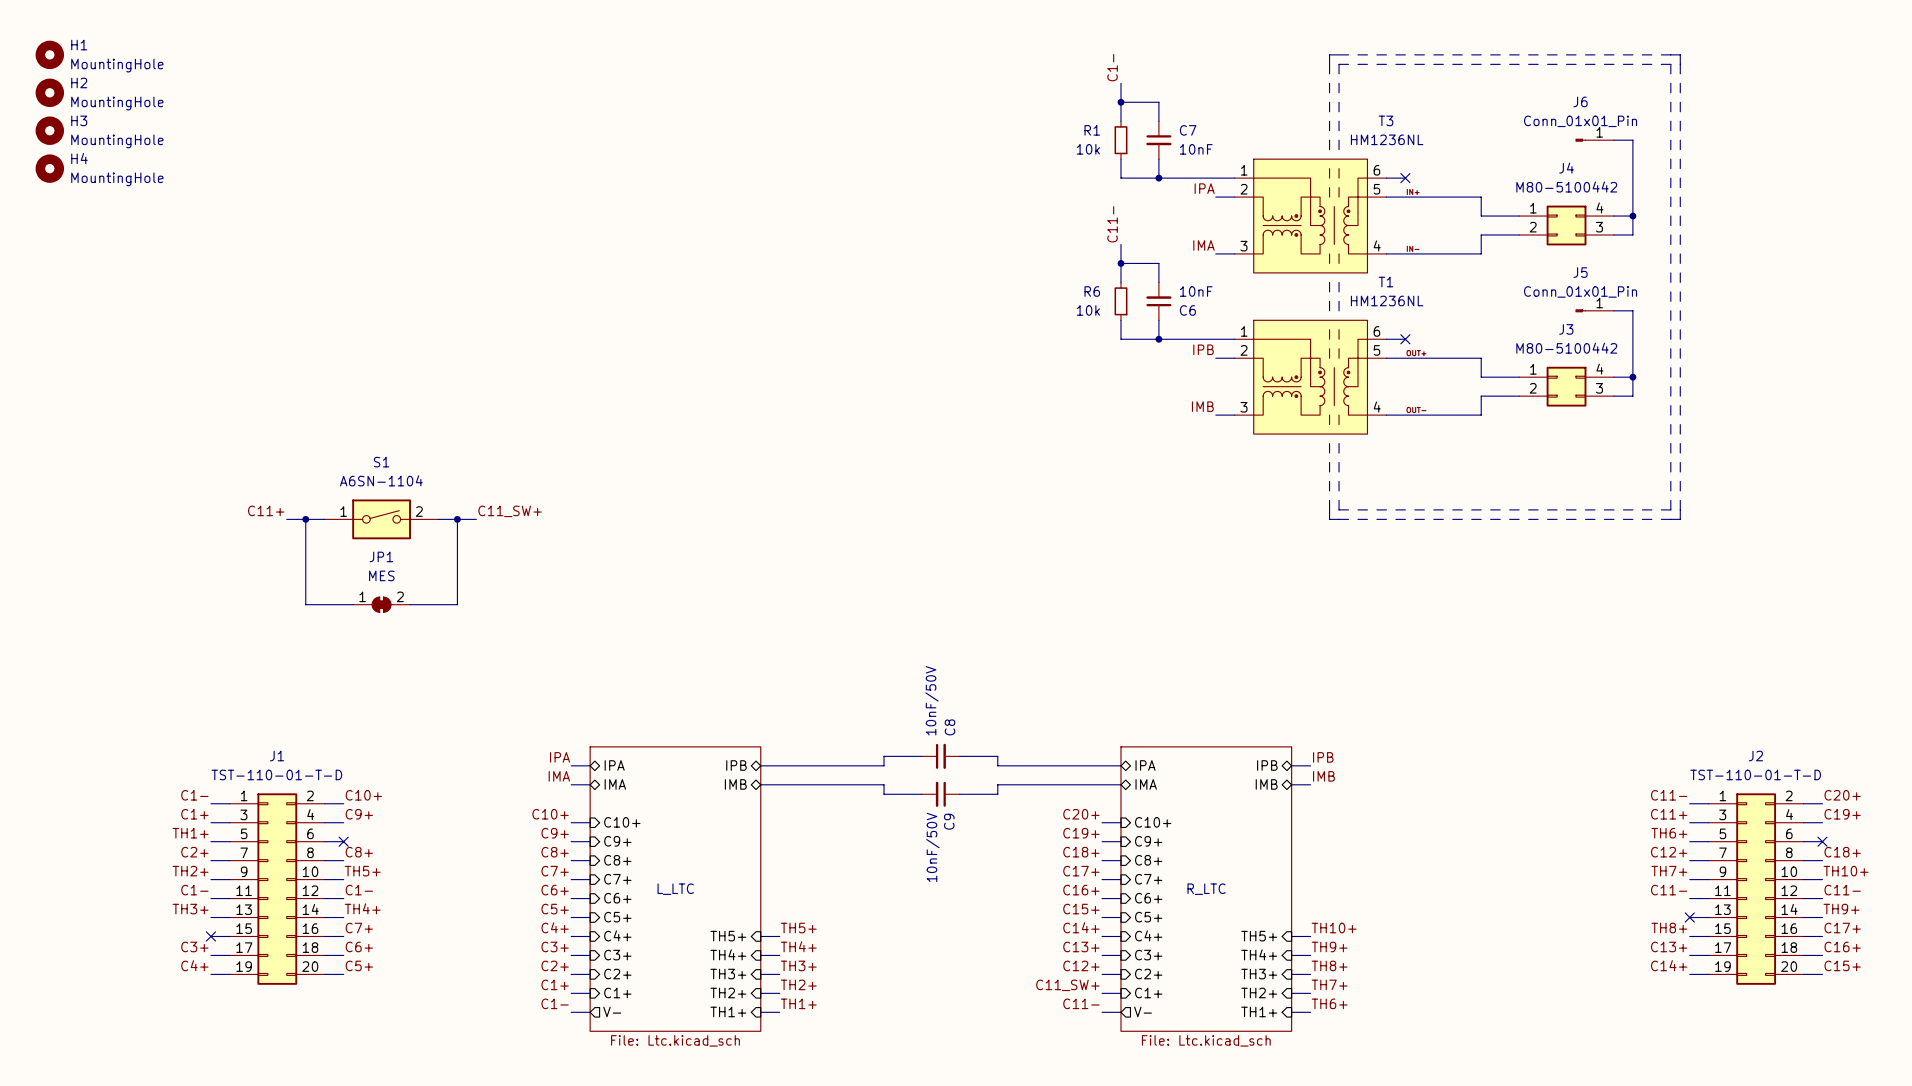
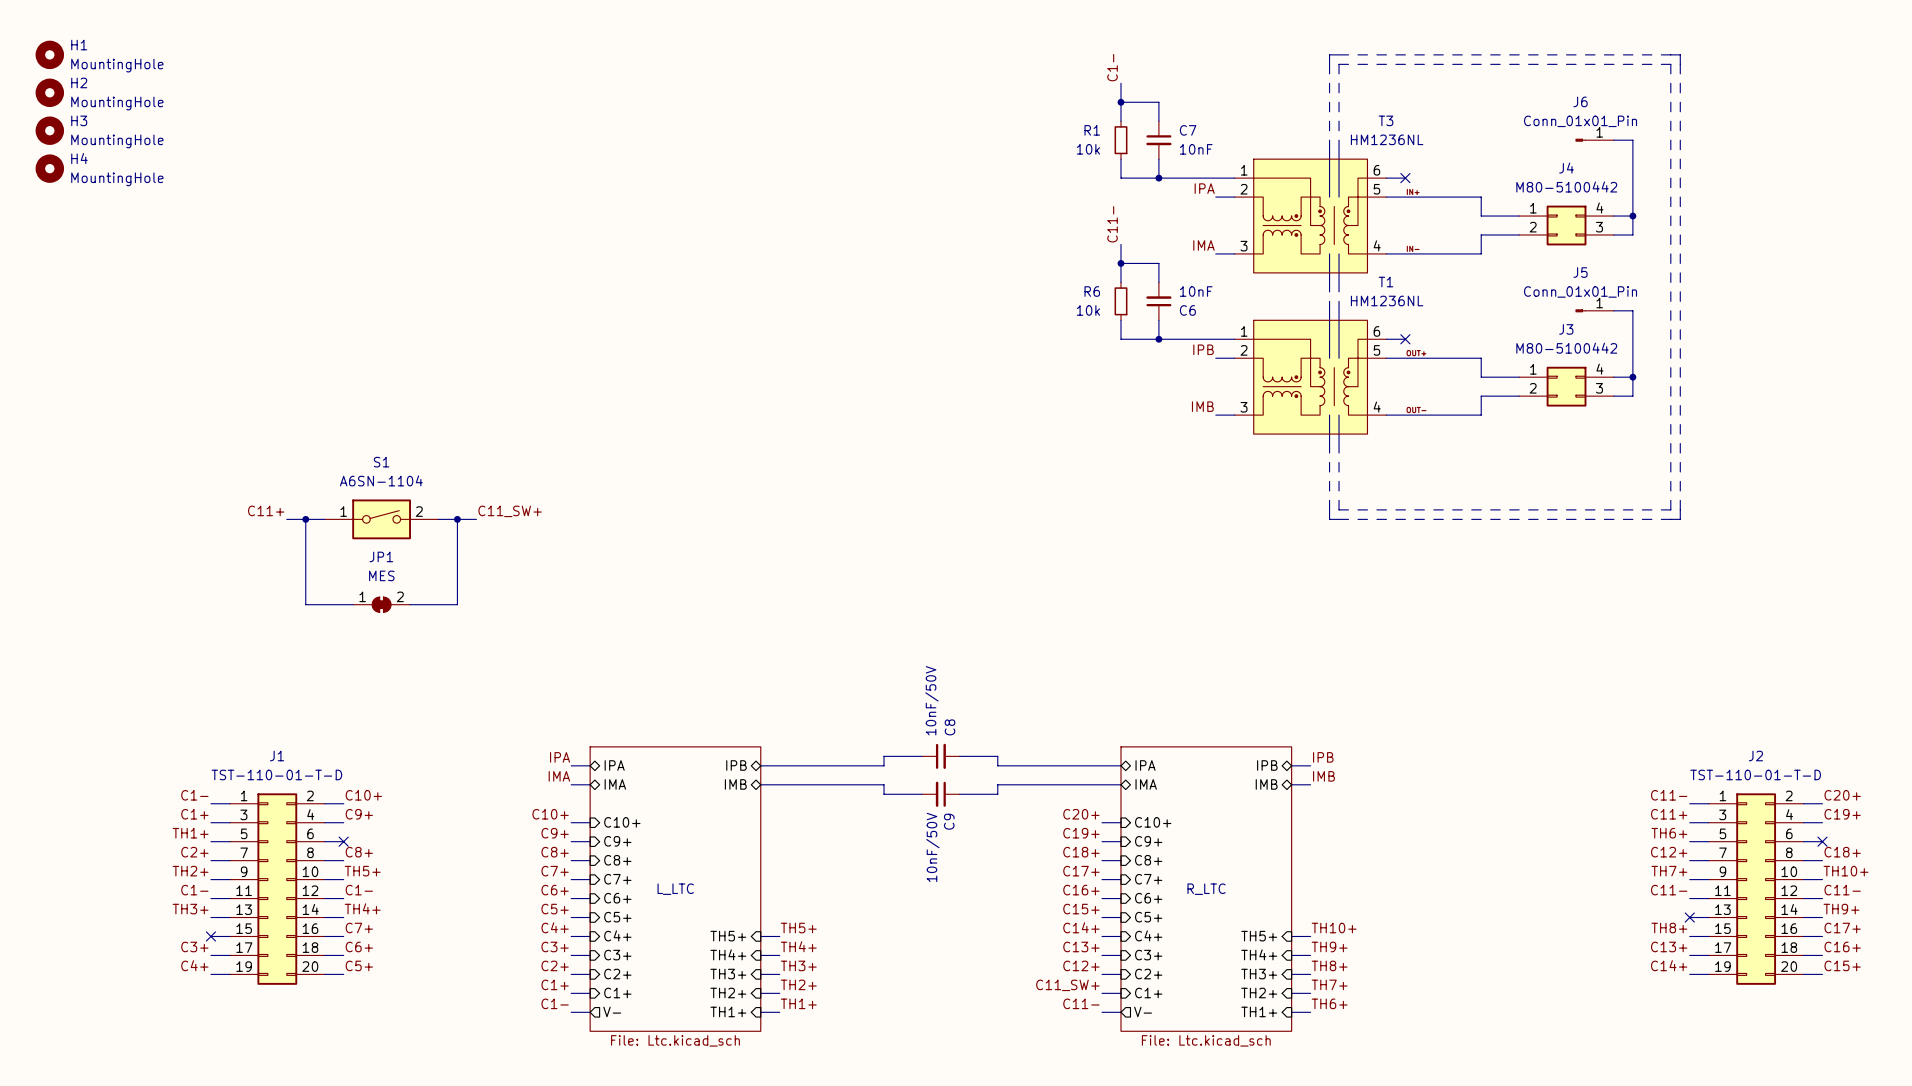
line: none -> (1329, 149) (1329, 197)
line: none -> (1339, 149) (1339, 197)
T3 symbol: [1234, 158, 1387, 274] -> [1234, 158, 1387, 274]
line: none -> (1329, 253) (1329, 282)
line: none -> (1339, 253) (1339, 282)
line: none -> (1329, 310) (1329, 358)
line: none -> (1339, 310) (1339, 358)
T1 symbol: [1234, 319, 1387, 435] -> [1234, 319, 1387, 435]
line: none -> (1329, 415) (1329, 443)
line: none -> (1339, 415) (1339, 443)

